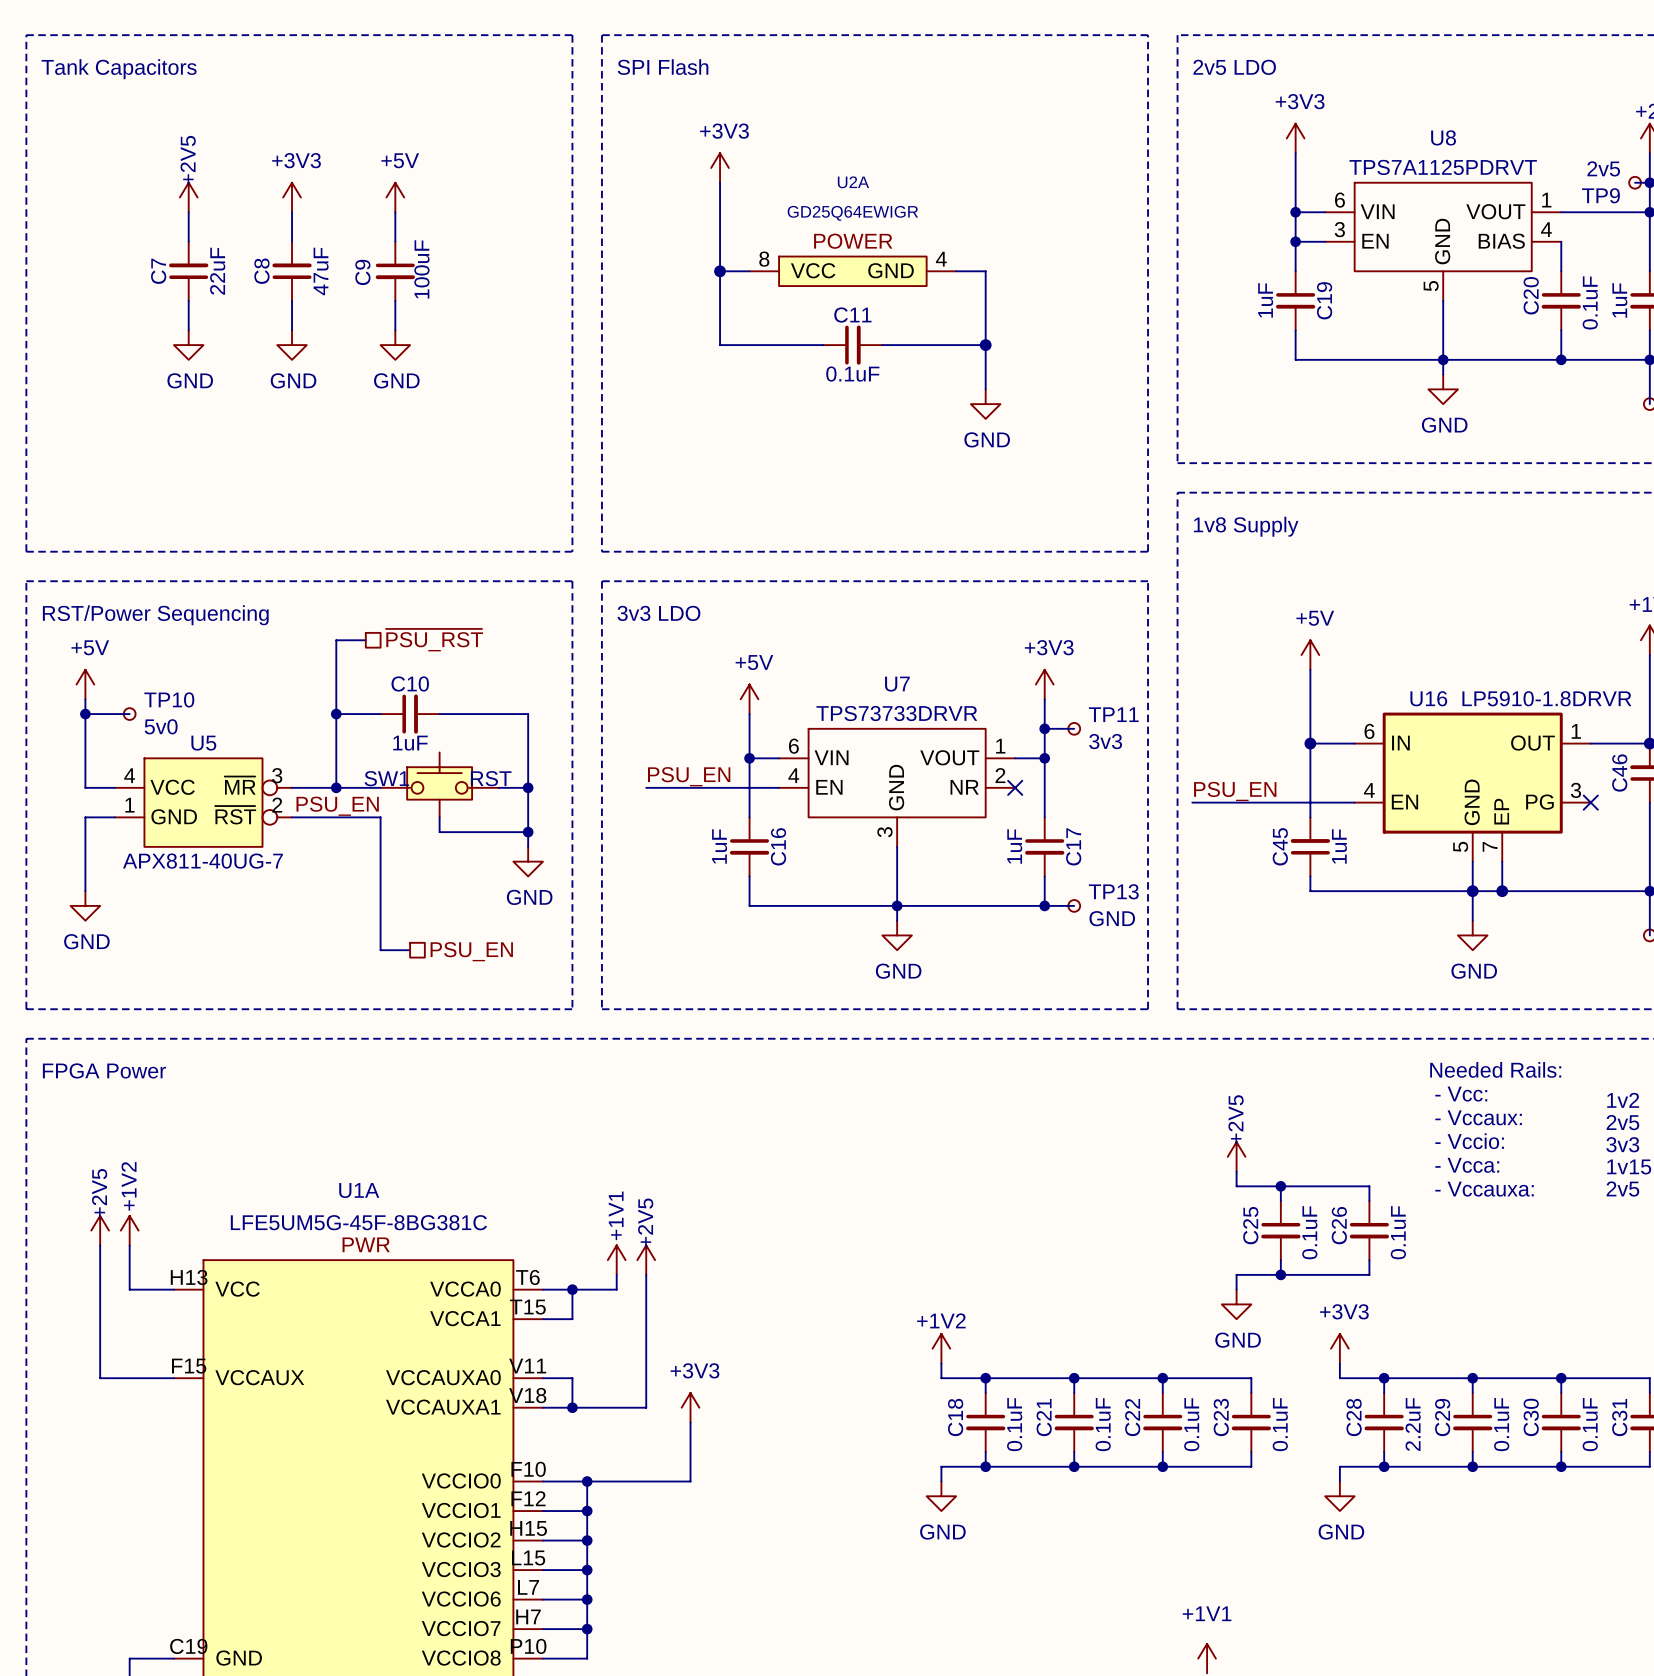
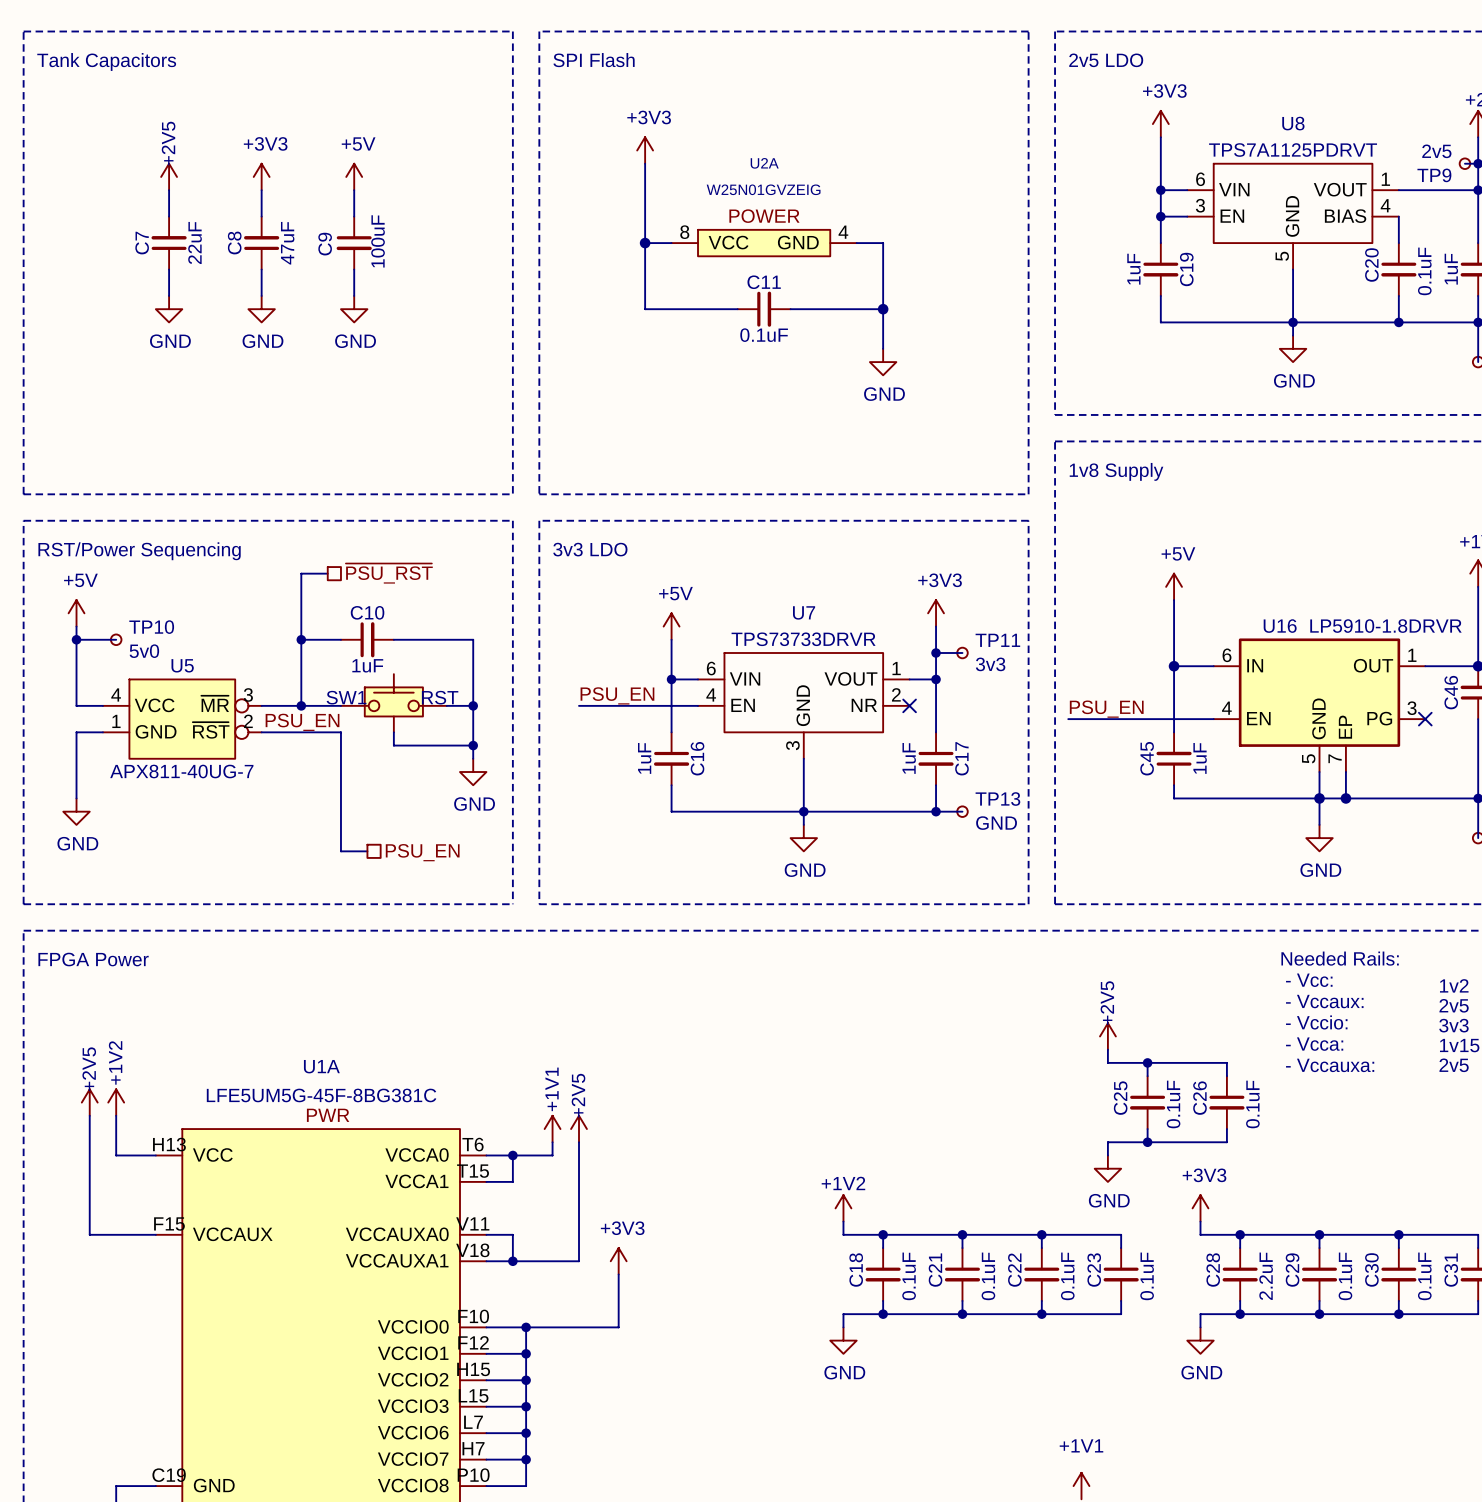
U2A value: GD25Q64EWIGR (852, 213) -> W25N01GVZEIG (763, 189)

